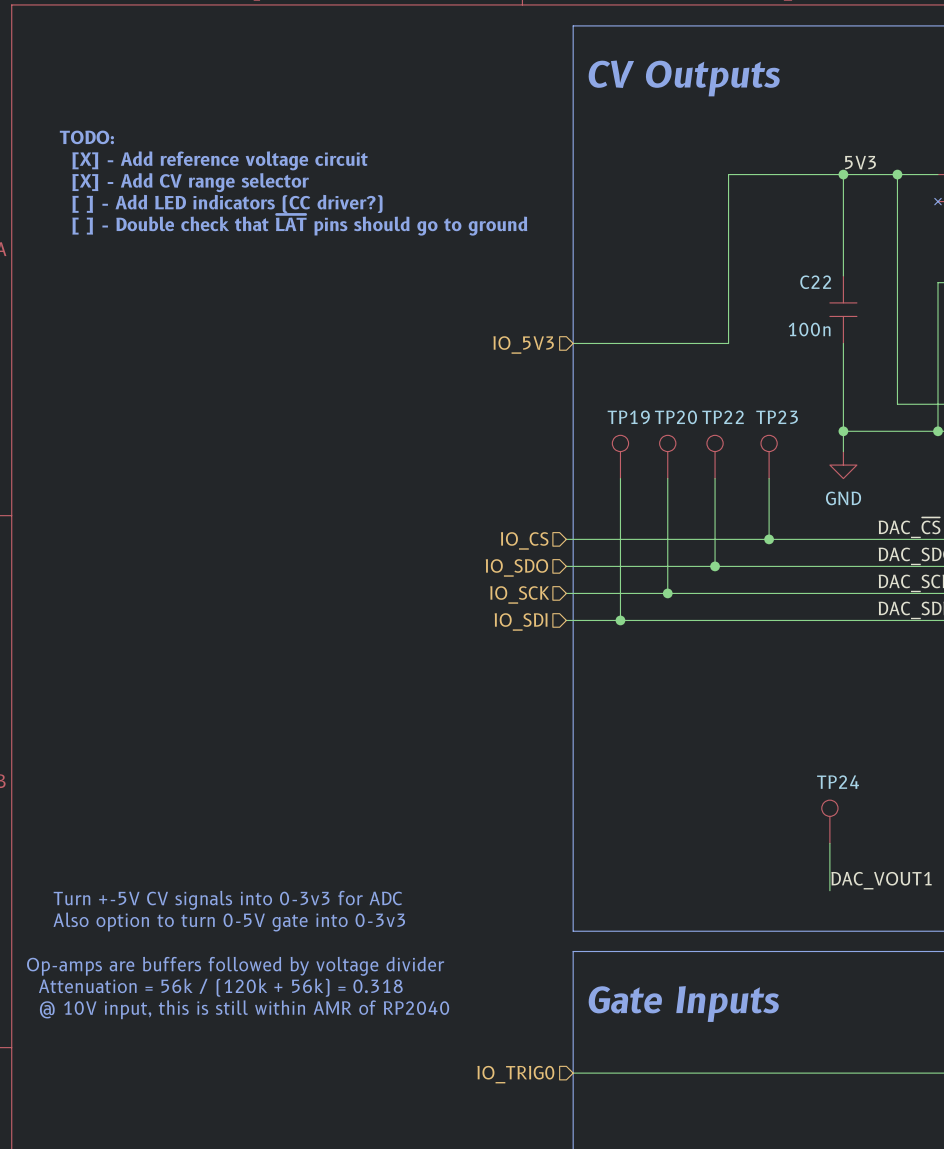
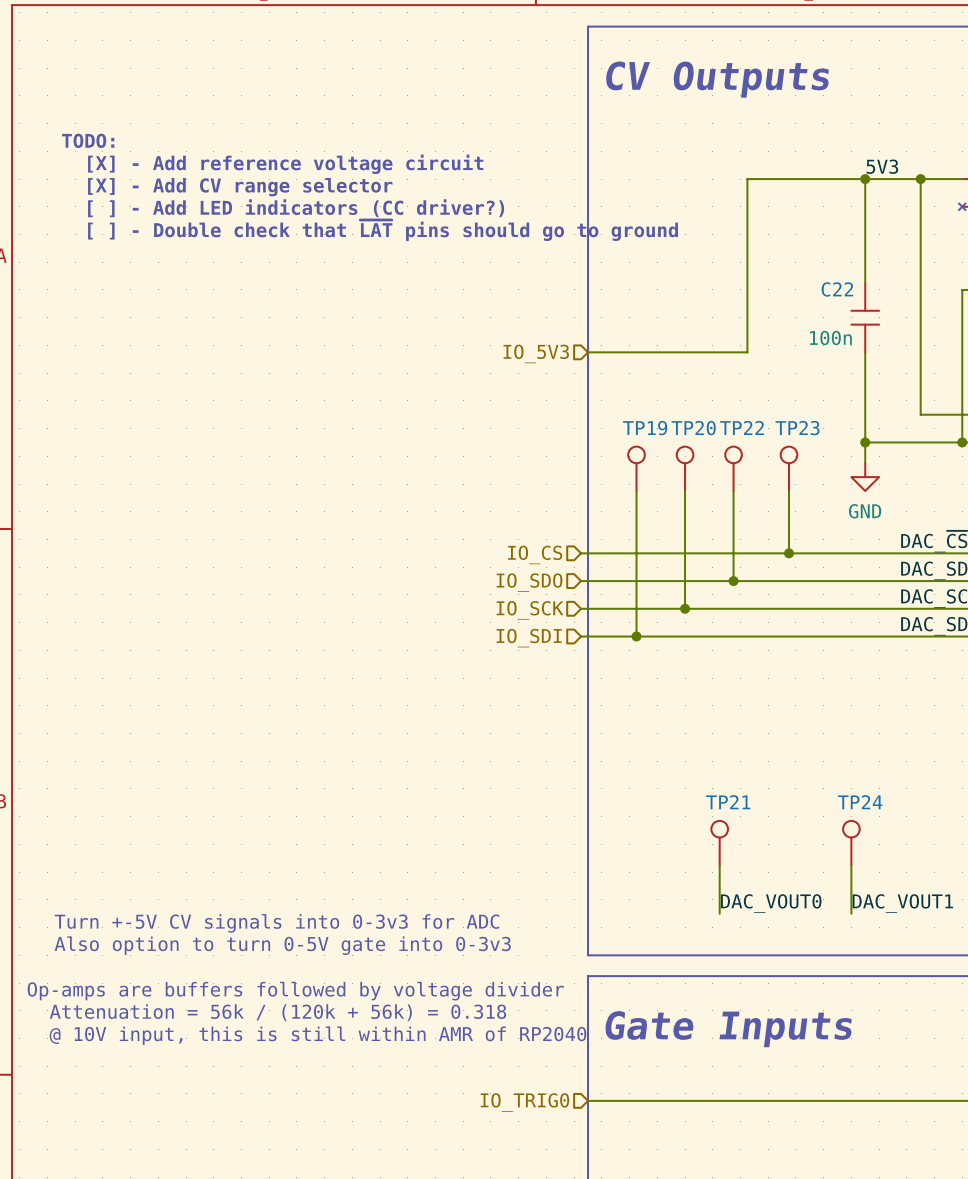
TP21: none -> (719, 843)
wire: none -> (719, 865) (719, 913)
label: none -> DAC_VOUT0 (771, 903)

